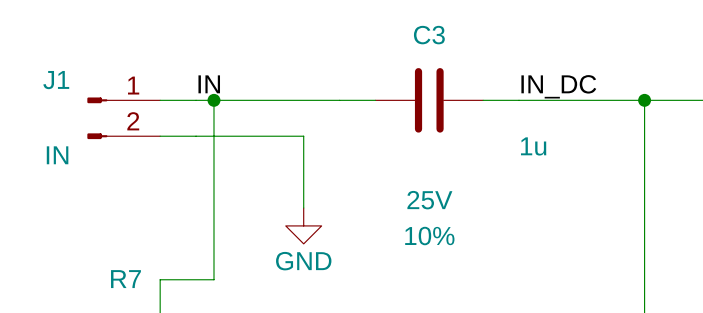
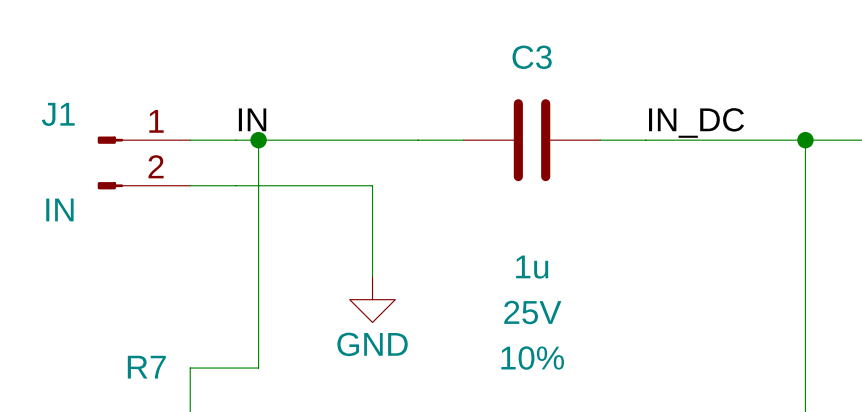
C3 value position: 1u (533, 146) -> 1u (532, 267)
C3 text position: 25V (429, 200) -> 25V (532, 312)
C3 text position: 10% (429, 236) -> 10% (532, 358)

